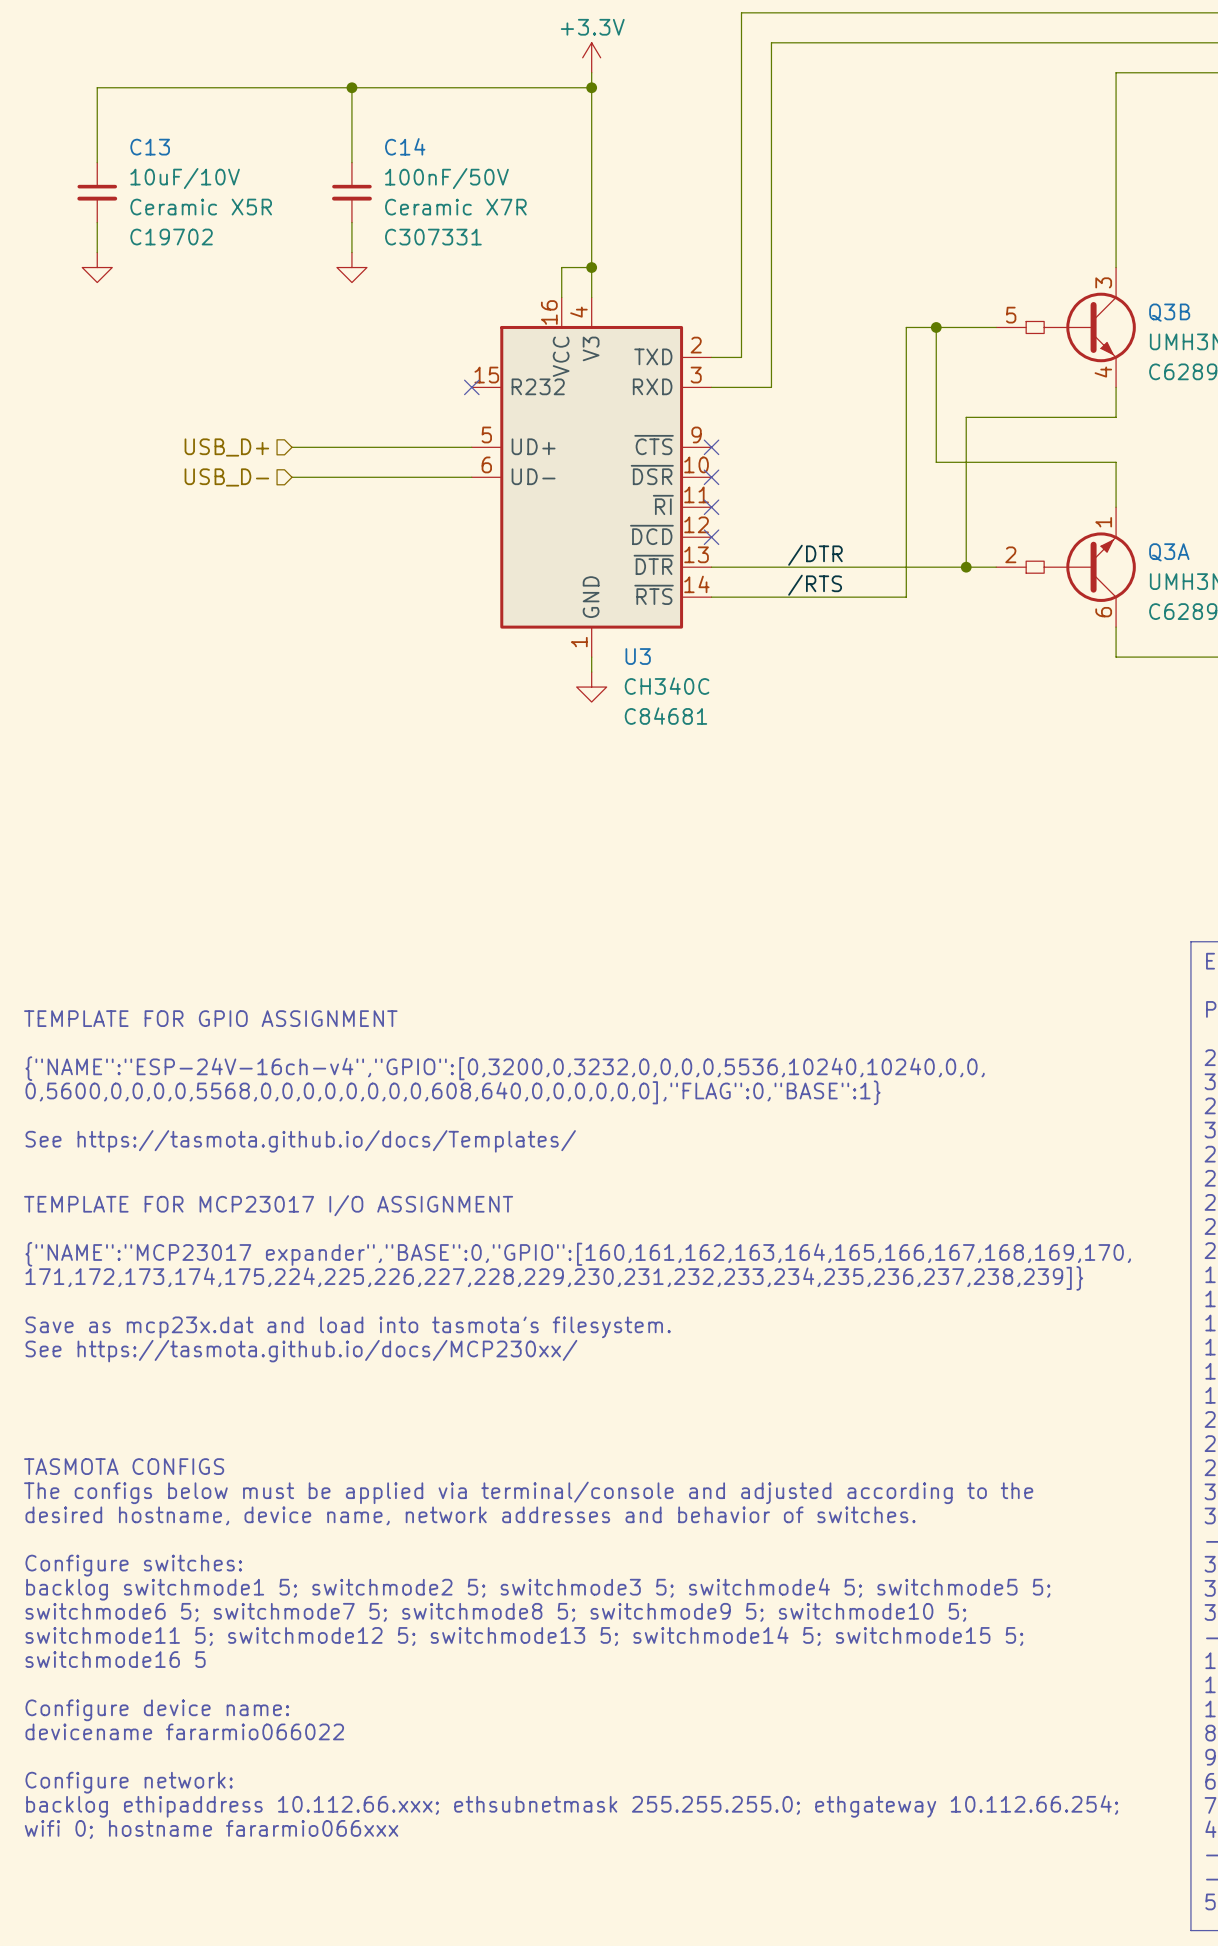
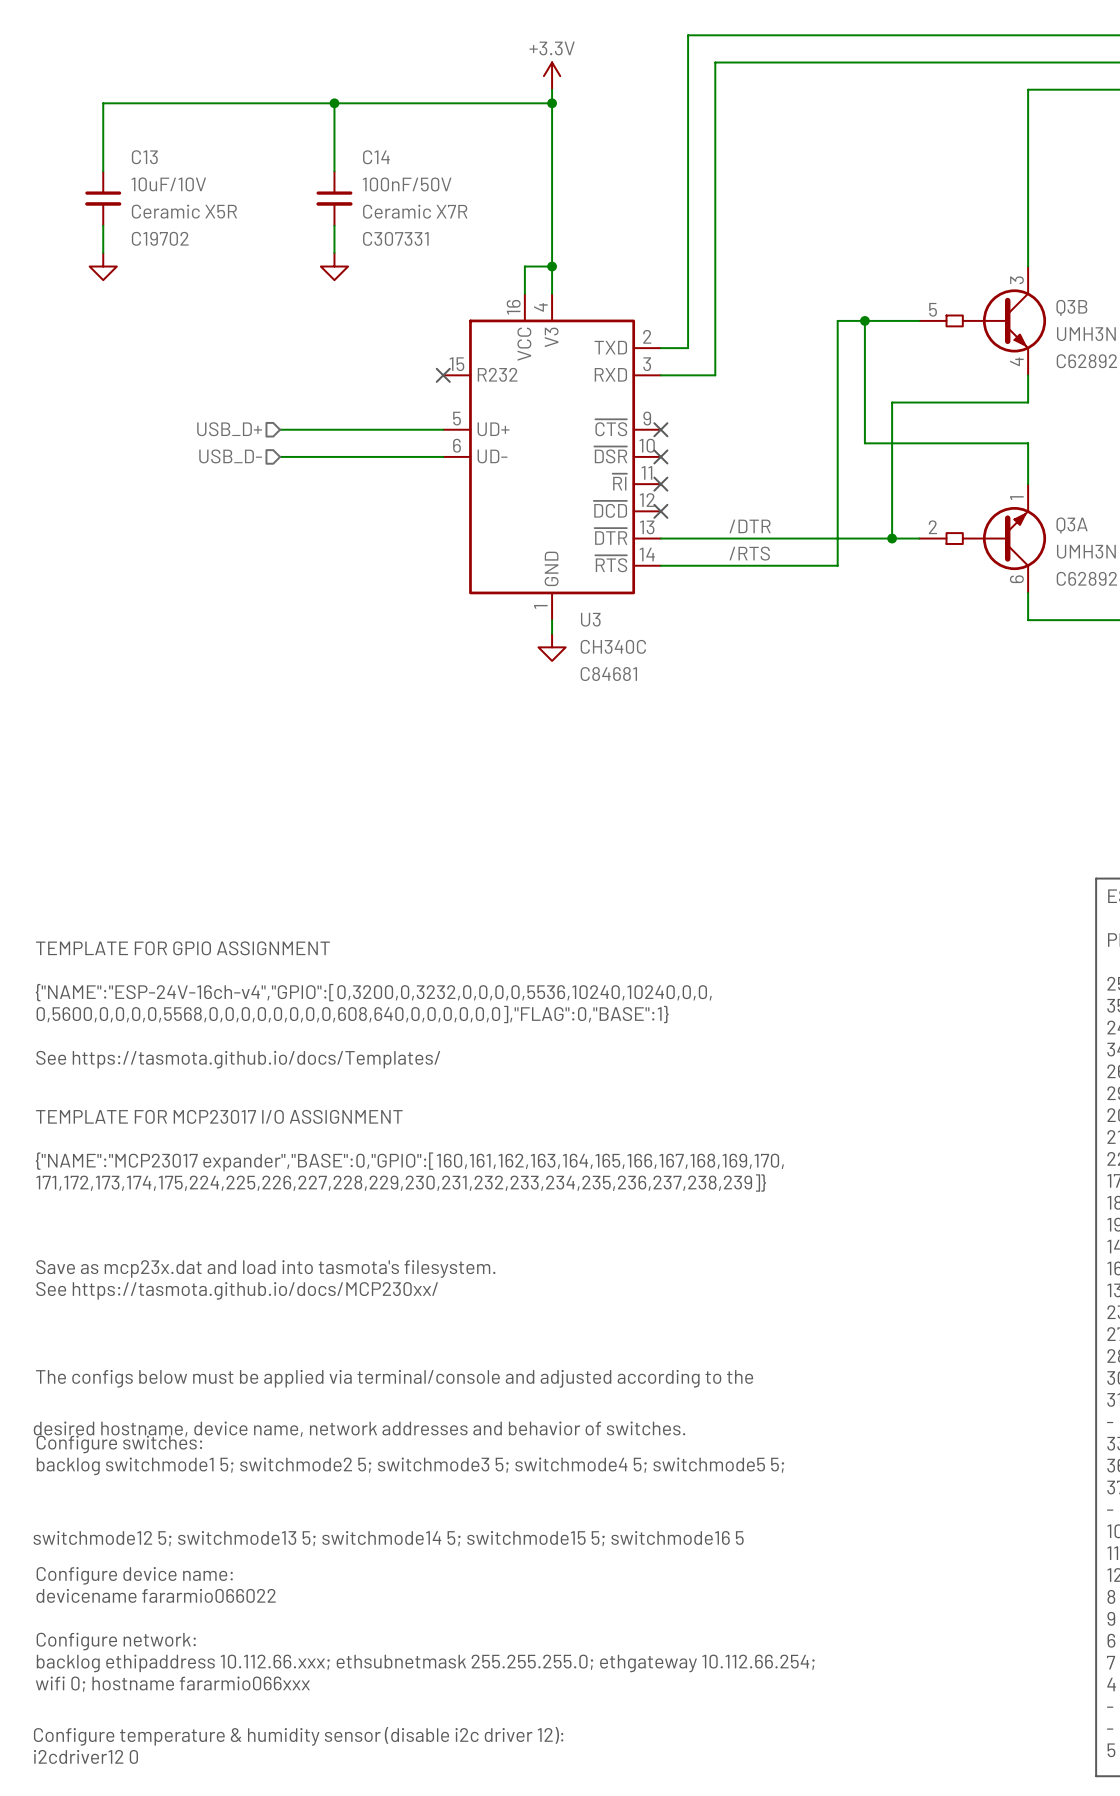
text position: Save as mcp23x.dat and load into tasmota's filesystem. (348, 1327) -> Save as mcp23x.dat and load into tasmota's filesystem. (265, 1269)
text position: See https://tasmota.github.io/docs/MCP230xx/ (301, 1351) -> See https://tasmota.github.io/docs/MCP230xx/ (237, 1290)
text: TASMOTA CONFIGS (124, 1466) -> none
text position: desired hostname, device name, network addresses and behavior of switches. (470, 1515) -> desired hostname, device name, network addresses and behavior of switches. (359, 1429)
text: switchmode6 5; switchmode7 5; switchmode8 5; switchmode9 5; switchmode10 5; (495, 1612) -> none
text: switchmode11 5; switchmode12 5; switchmode13 5; switchmode14 5; switchmode15 5; (524, 1636) -> none
text: switchmode16 5 (115, 1659) -> switchmode12 5; switchmode13 5; switchmode14 5; switchmode15 5; switchmode16 5 (388, 1538)
text: none -> Configure temperature & humidity sensor (disable i2c driver 12): (298, 1736)
text: none -> i2cdriver12 0 (85, 1756)

